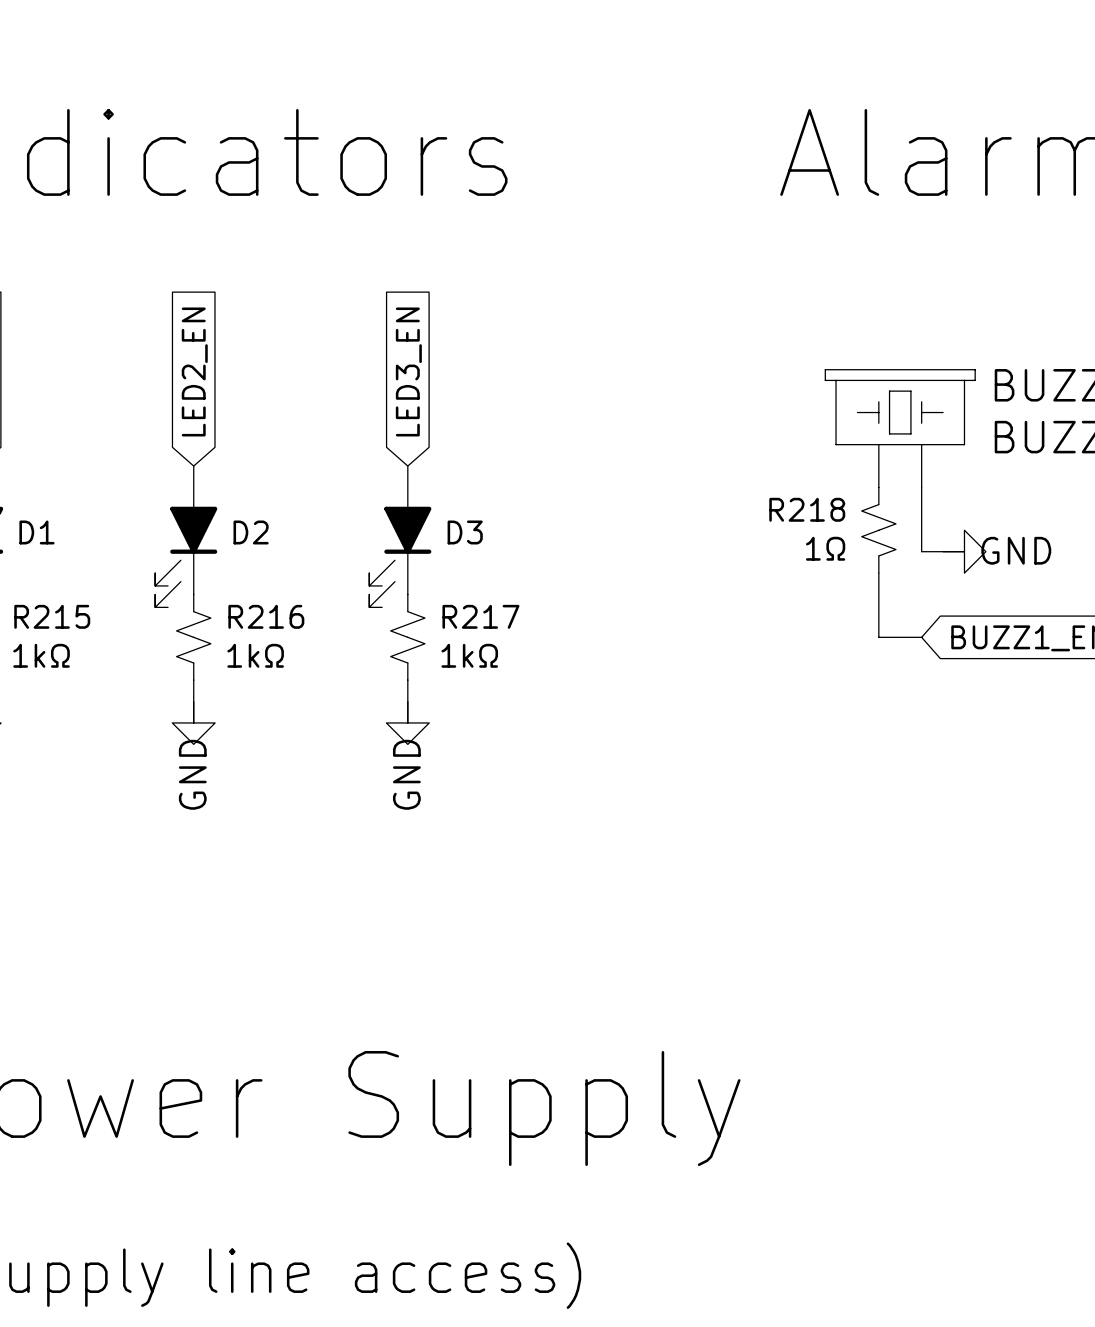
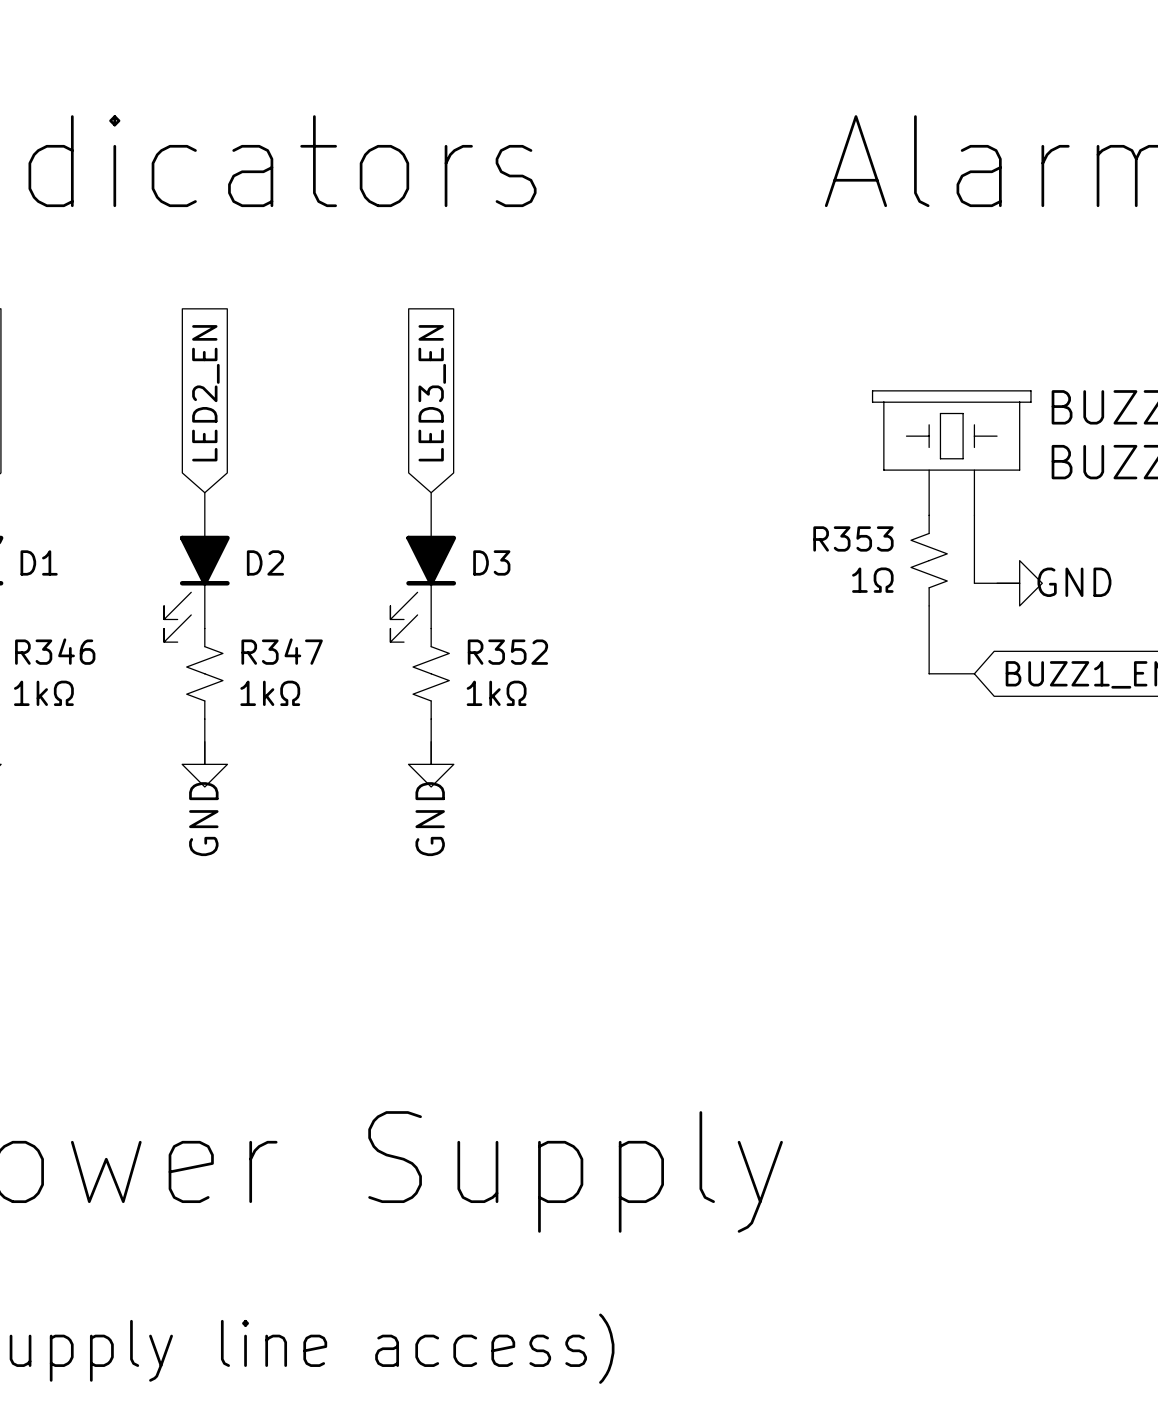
R218 name: R218 (807, 509) -> R353 (853, 538)
R215 name: R215 (52, 616) -> R346 (55, 651)
R216 name: R216 (266, 616) -> R347 (282, 651)
R217 name: R217 (480, 616) -> R352 (507, 652)

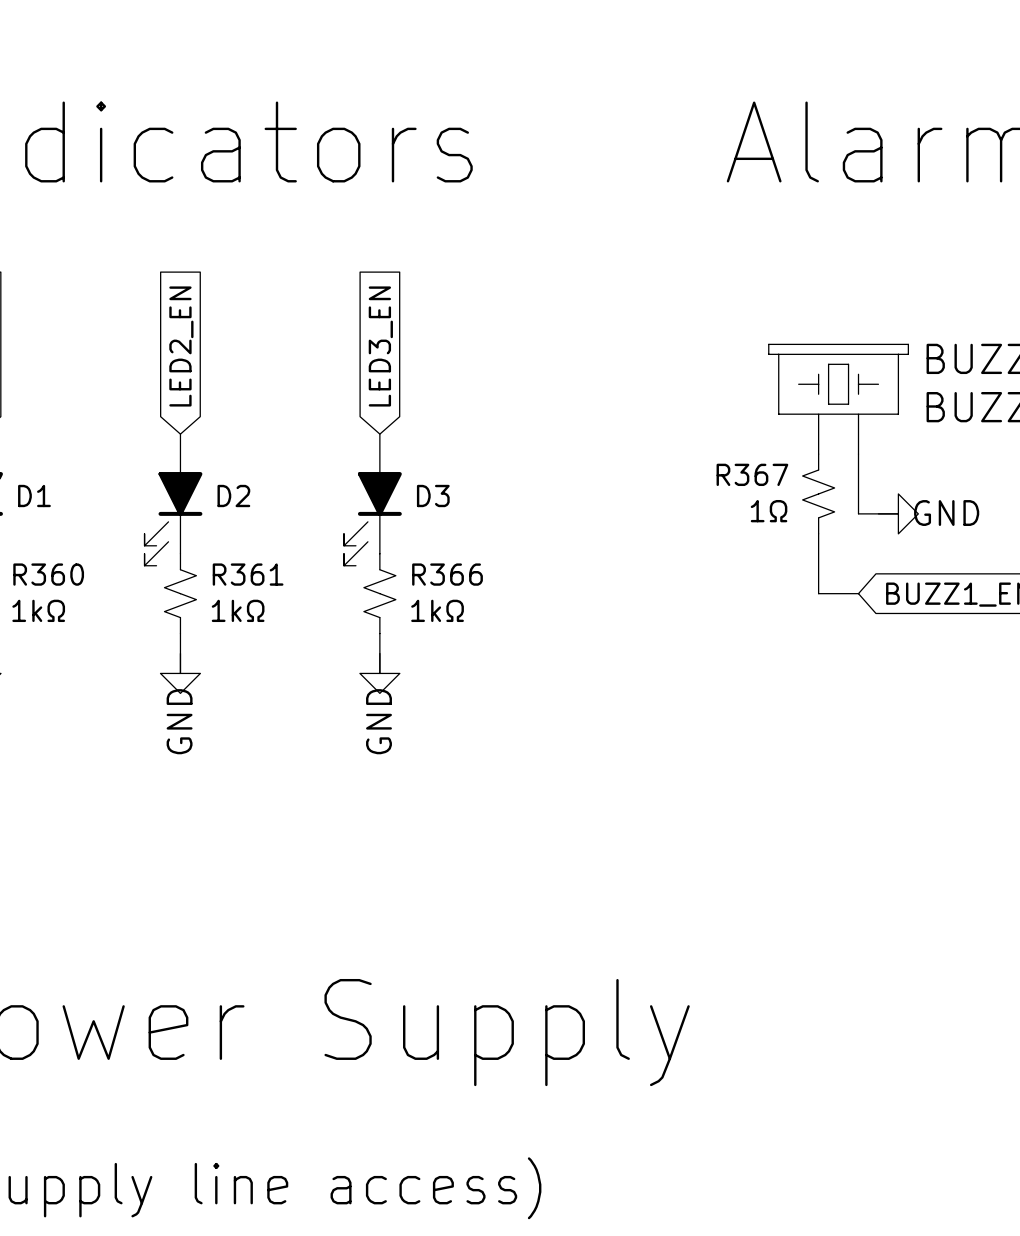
R353 name: R353 (853, 538) -> R367 (752, 474)
R346 name: R346 (55, 651) -> R360 (48, 574)
R347 name: R347 (282, 651) -> R361 (248, 574)
R352 name: R352 (507, 652) -> R366 (447, 574)

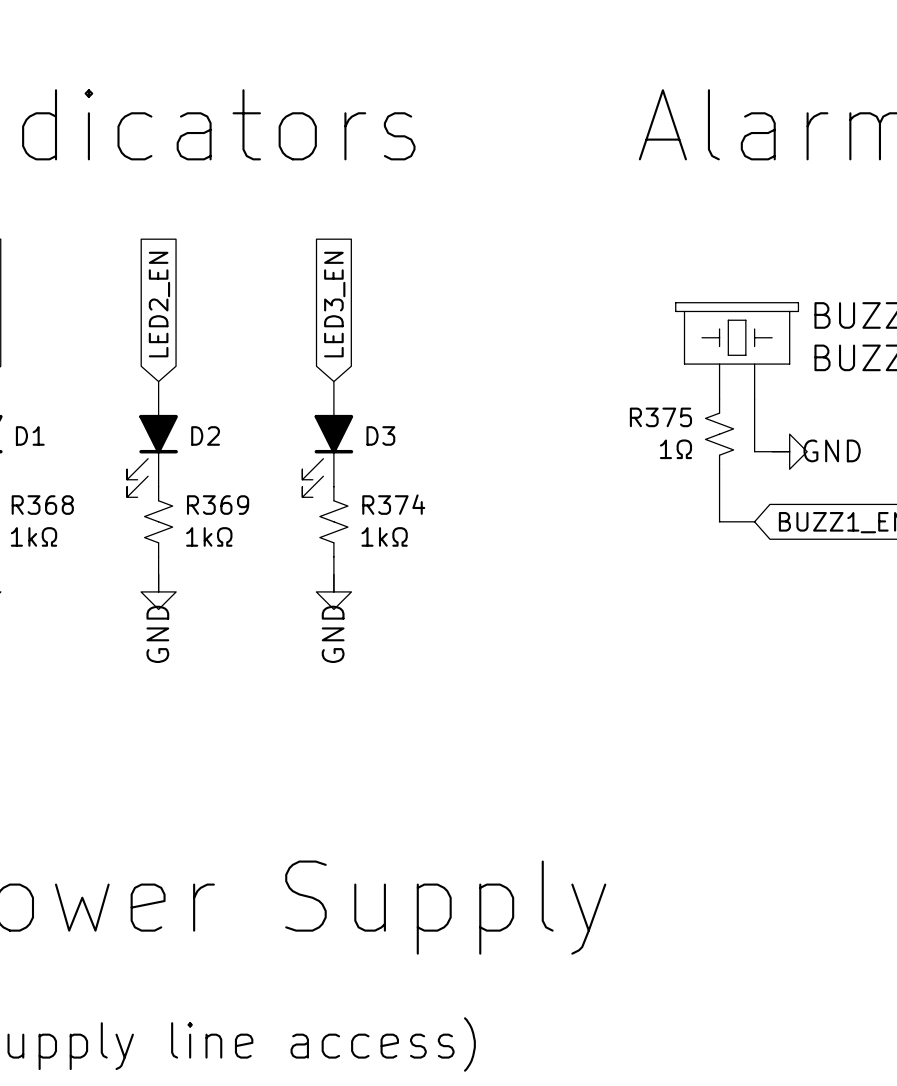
R367 name: R367 (752, 474) -> R375 (660, 417)
R360 name: R360 (48, 574) -> R368 (42, 505)
R361 name: R361 (248, 574) -> R369 (218, 505)
R366 name: R366 (447, 574) -> R374 (393, 504)

